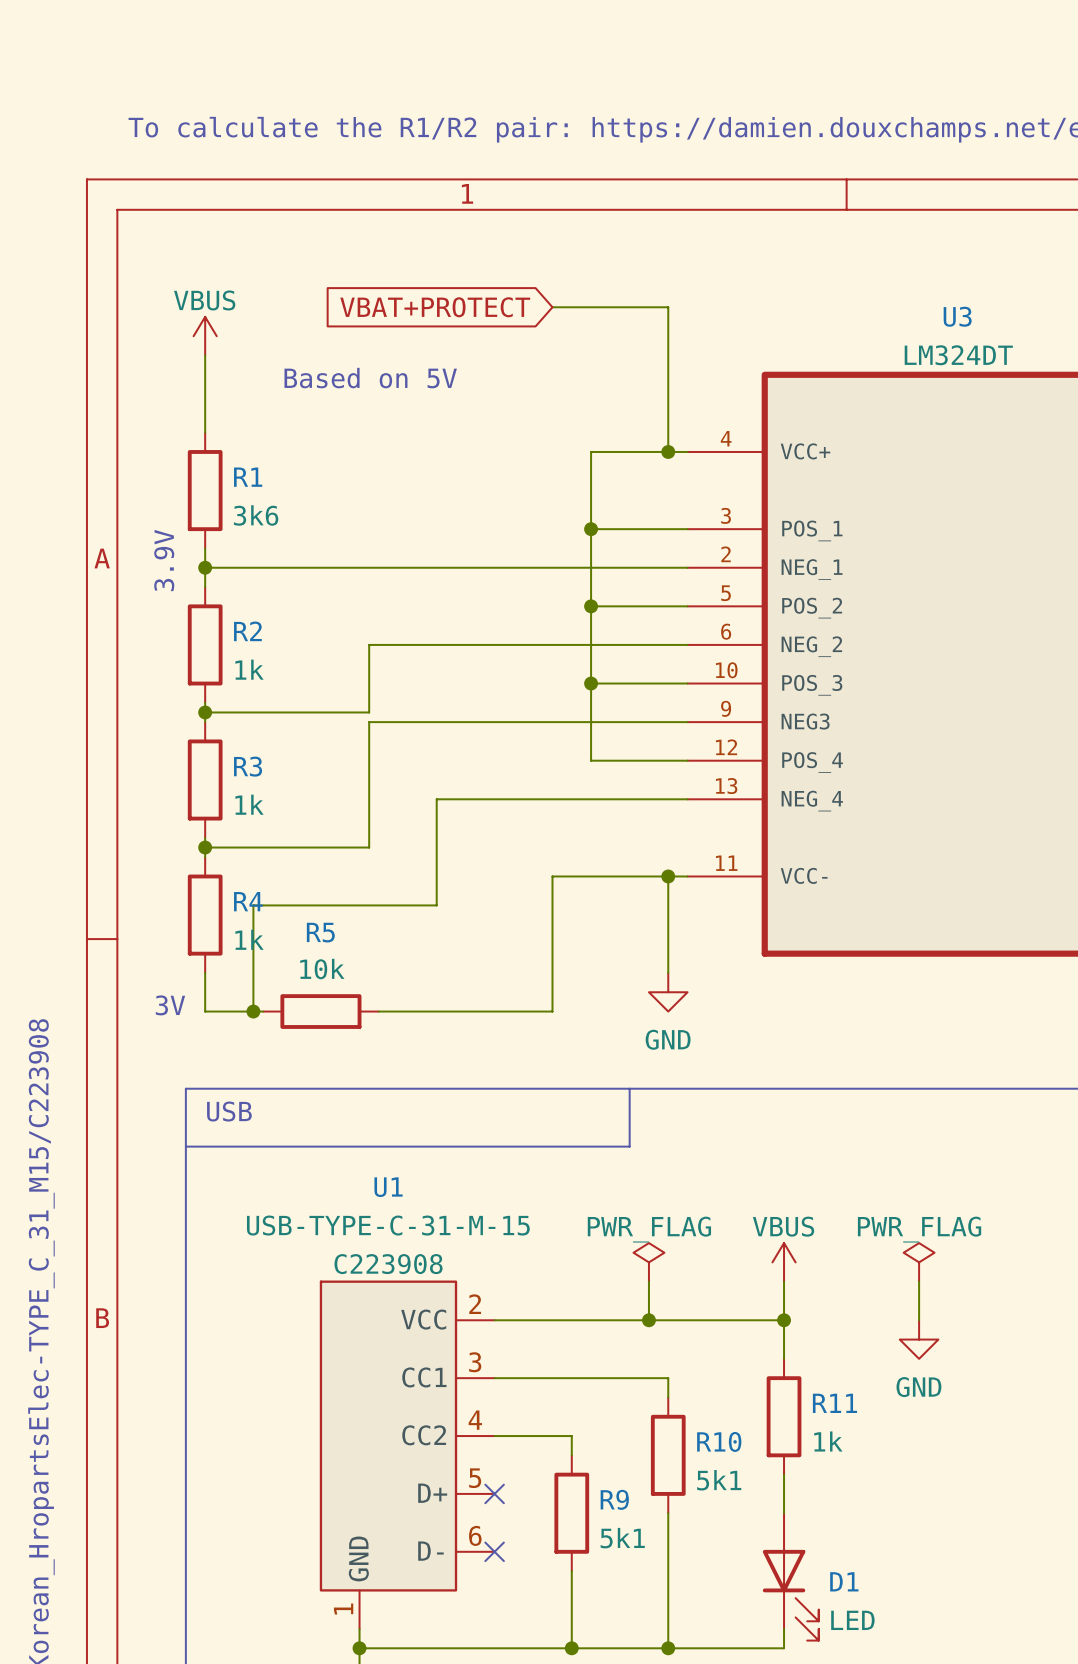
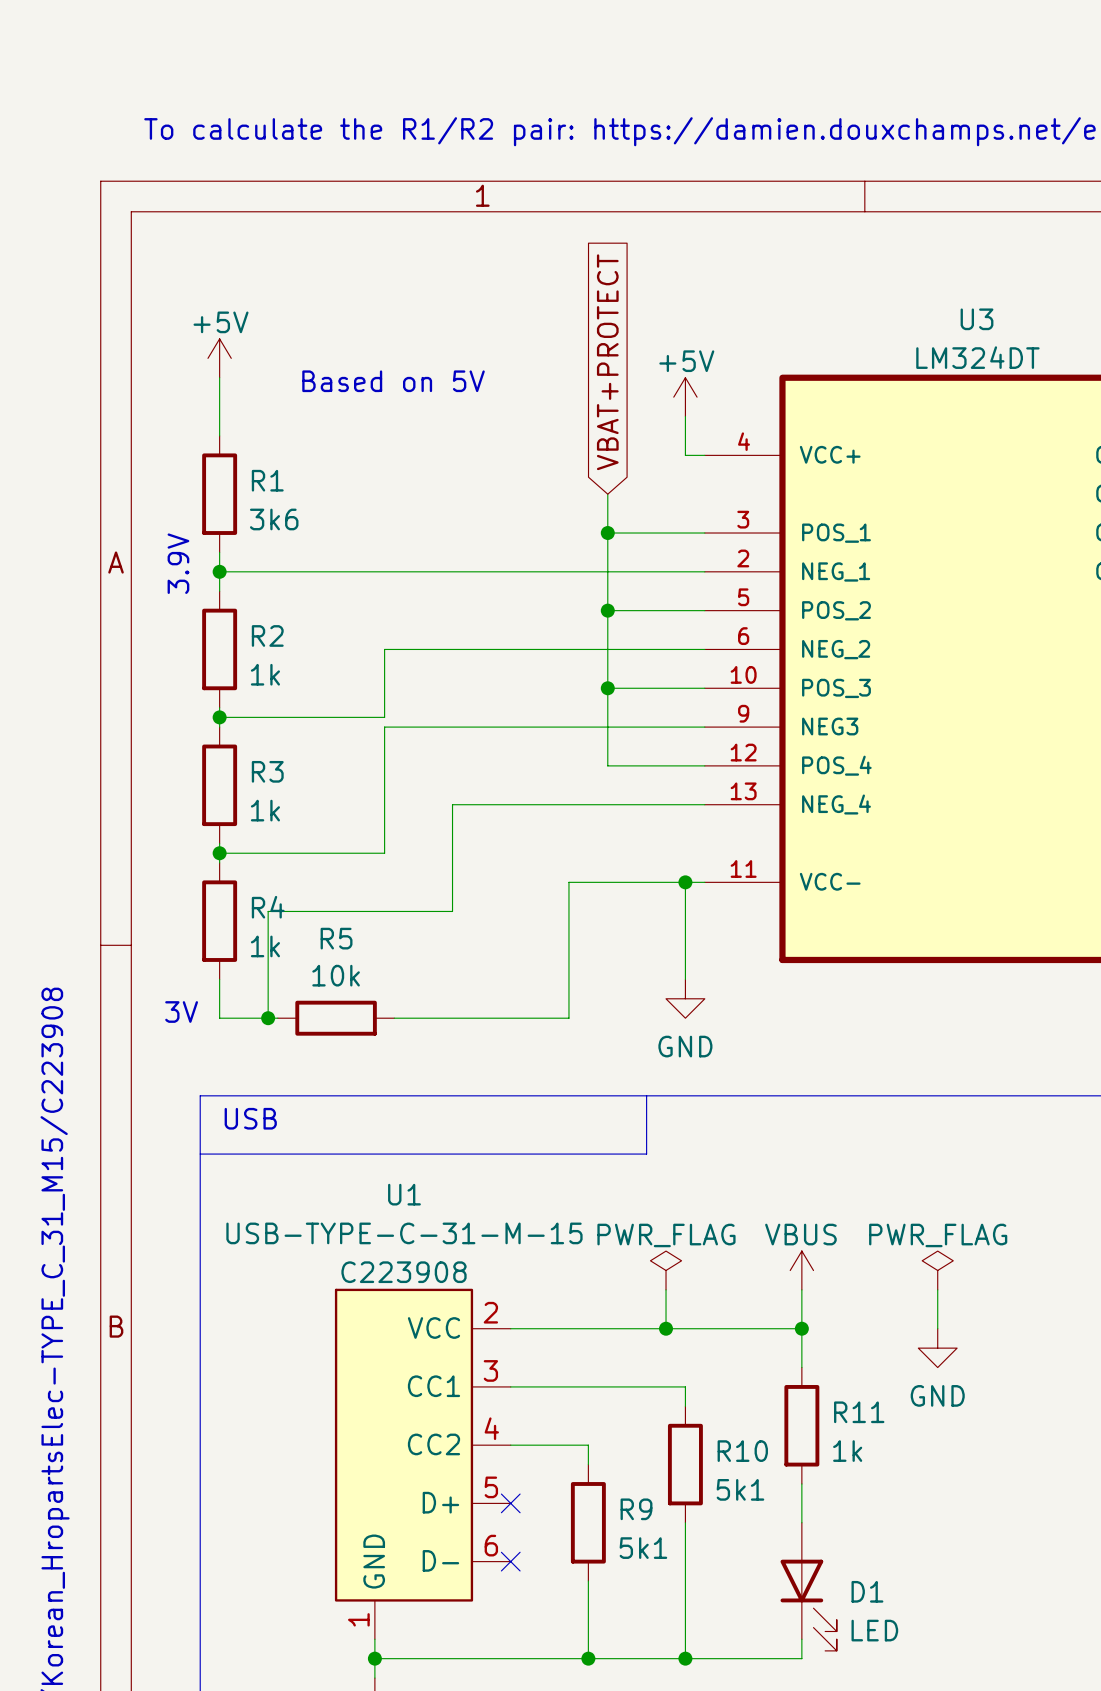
global label rotation: 0° (435, 307) -> 90° clockwise (607, 362)
wire: (552, 307) (668, 307) (668, 413) -> none
power symbol: VBUS (205, 336) -> none
power symbol: none -> +5V (219, 358)
power symbol: none -> +5V (685, 397)
wire: (668, 451) (591, 451) (591, 490) -> none
junction: (668, 451) -> none

